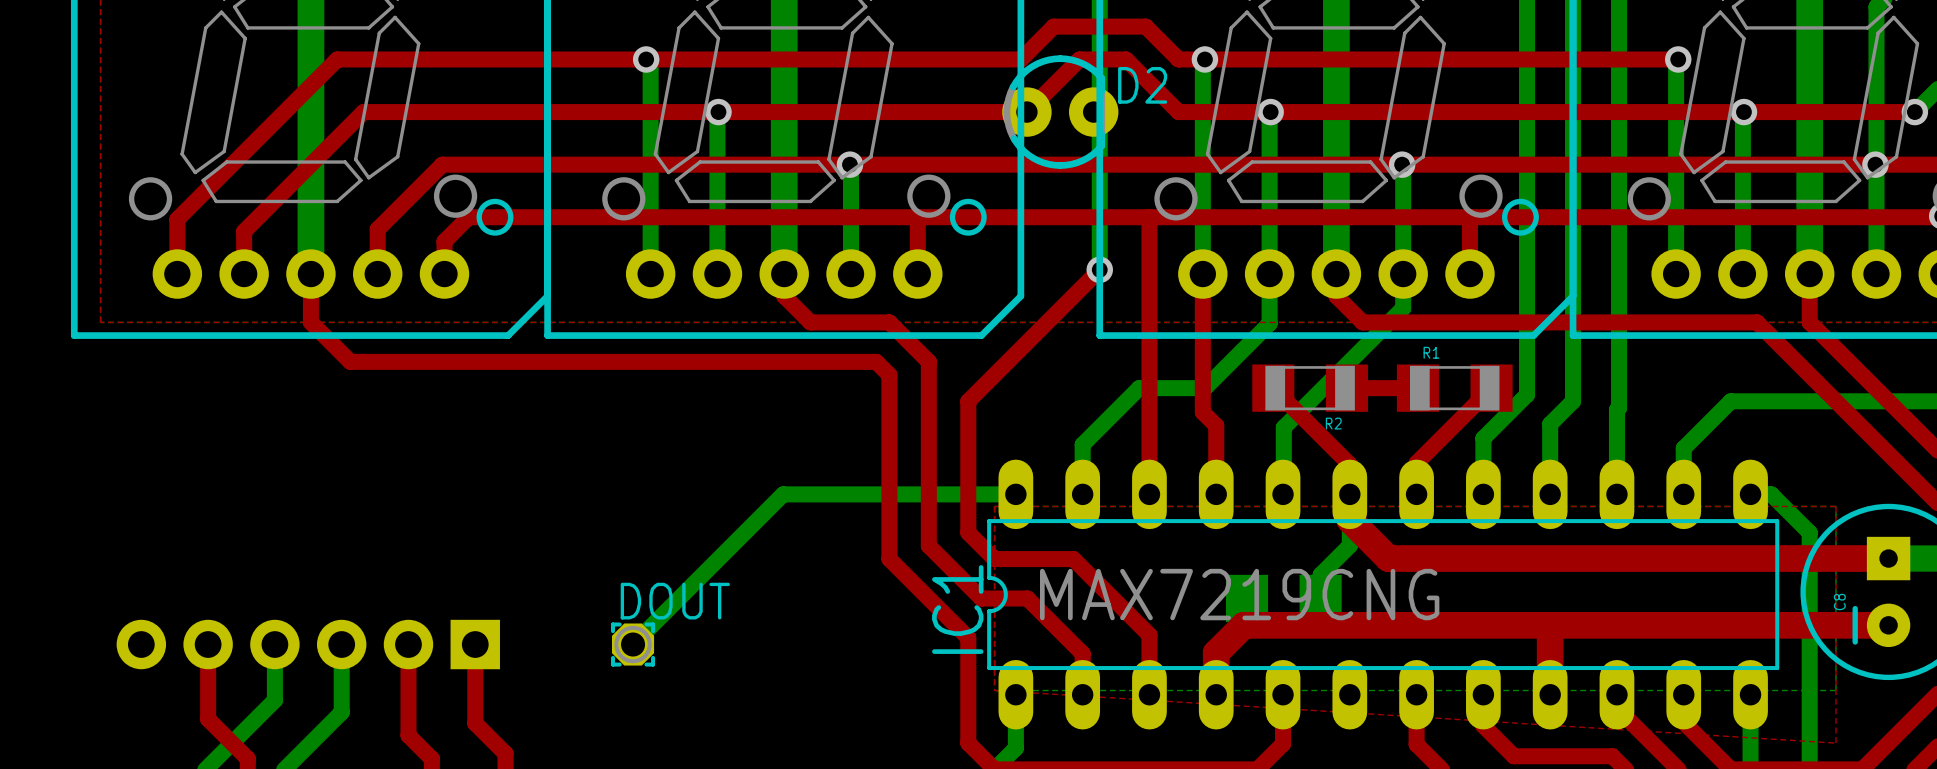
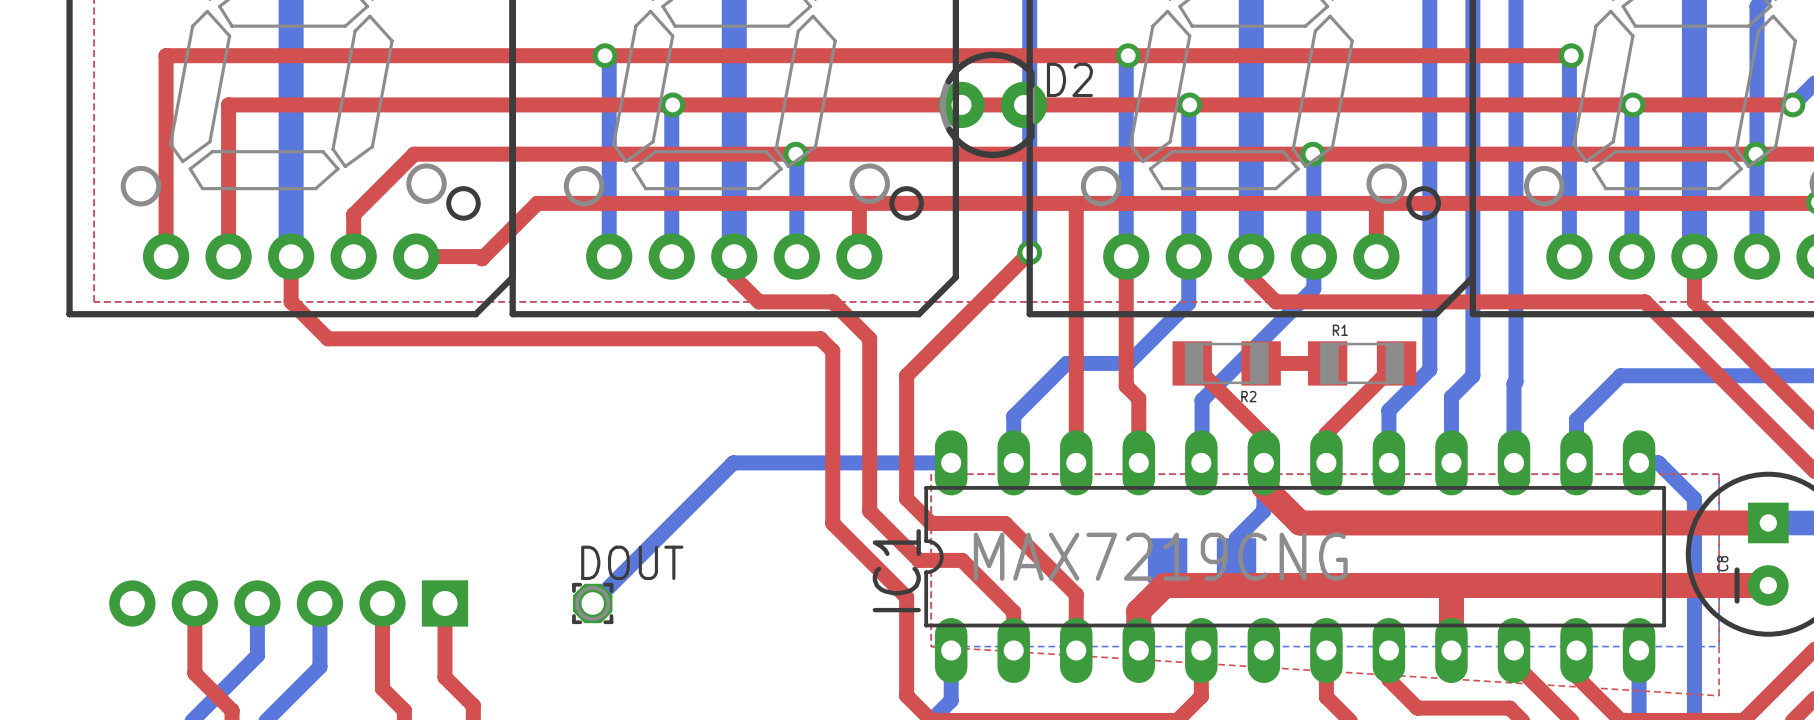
top track: (337, 59) (177, 219) -> (315, 55) (166, 55) (166, 205)
top track: (1020, 59) (1053, 26) (1145, 26) (1178, 59) -> none
top track: (1079, 59) (1026, 112) -> (1010, 55) (955, 55)
top track: (1126, 59) (1178, 112) -> (1054, 55) (1103, 55)
top track: (363, 112) (244, 231) -> (340, 104) (228, 104) (228, 216)
top track: none -> (961, 104) (1103, 104)
top track: (573, 217) (468, 217) (444, 241) (444, 274) -> (537, 203) (481, 258) (479, 256) (416, 256)

